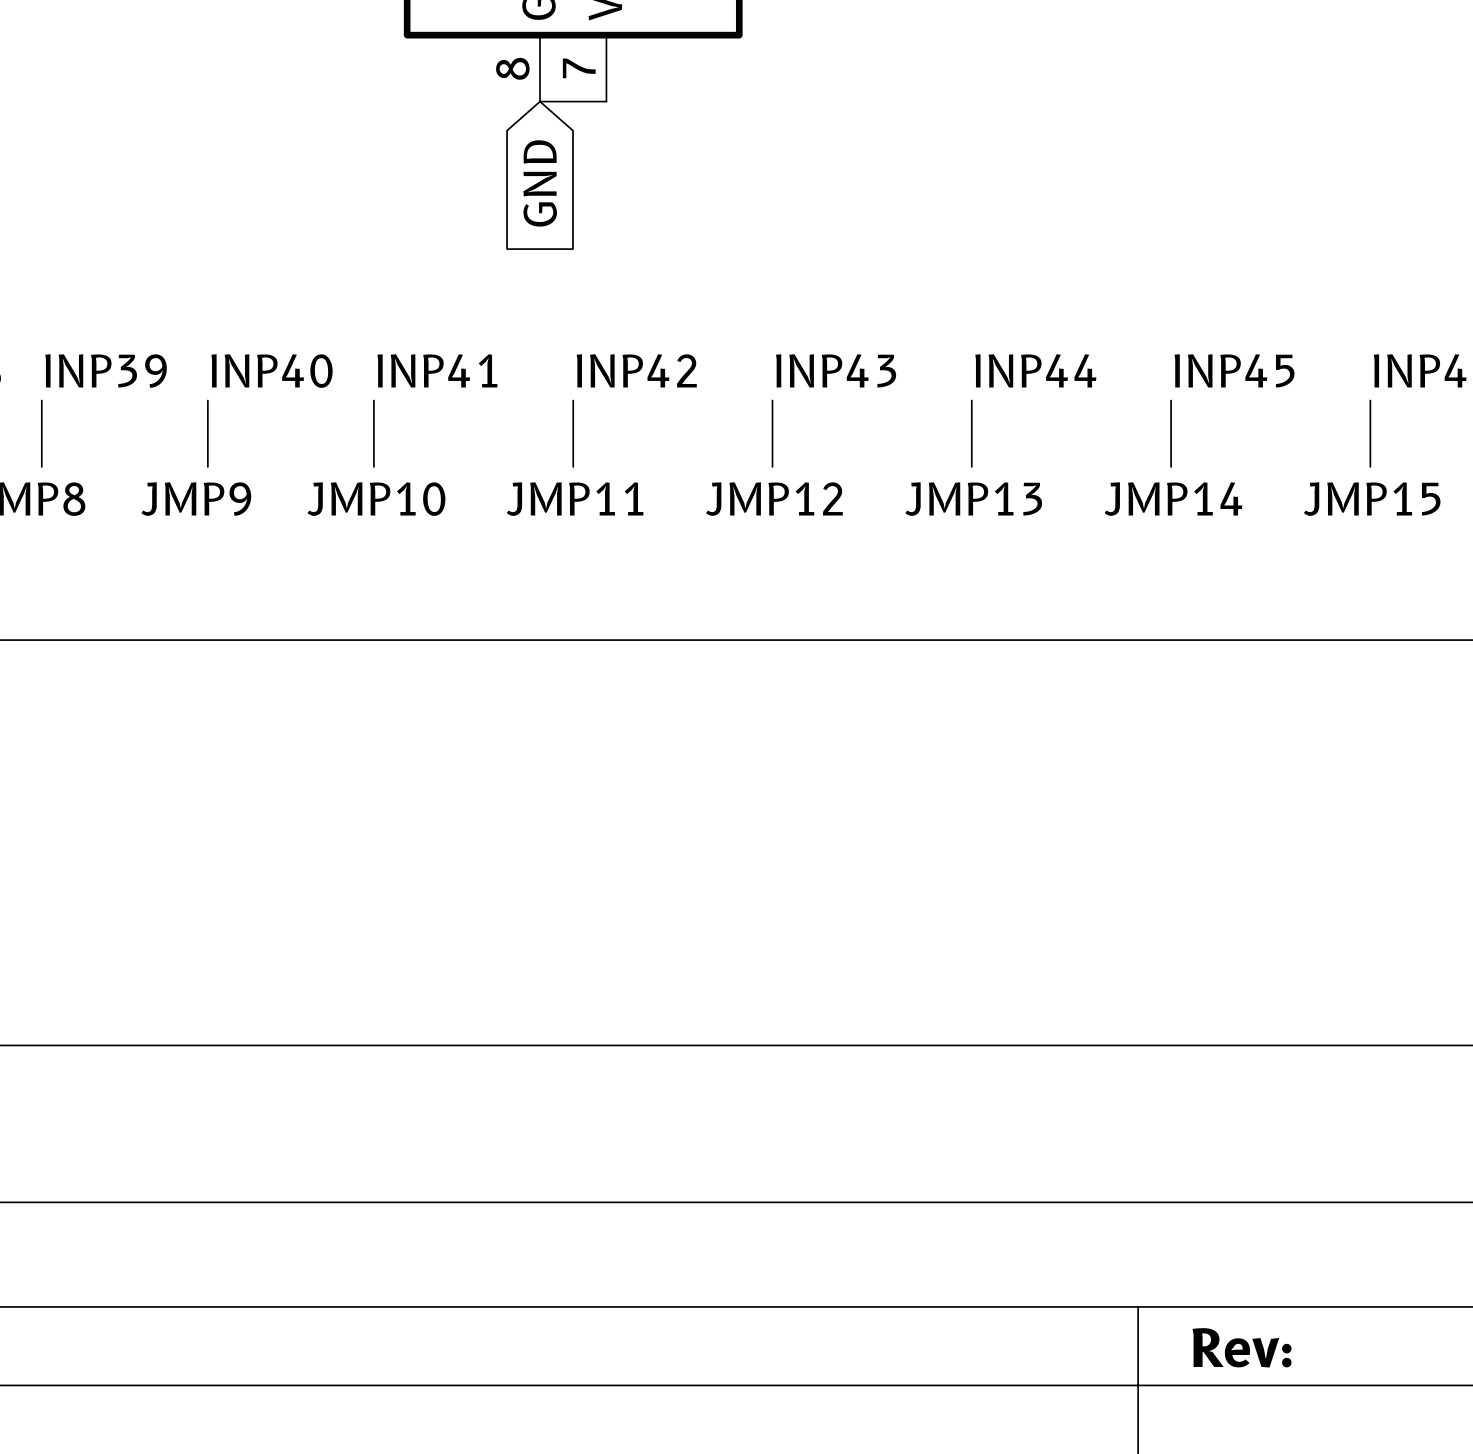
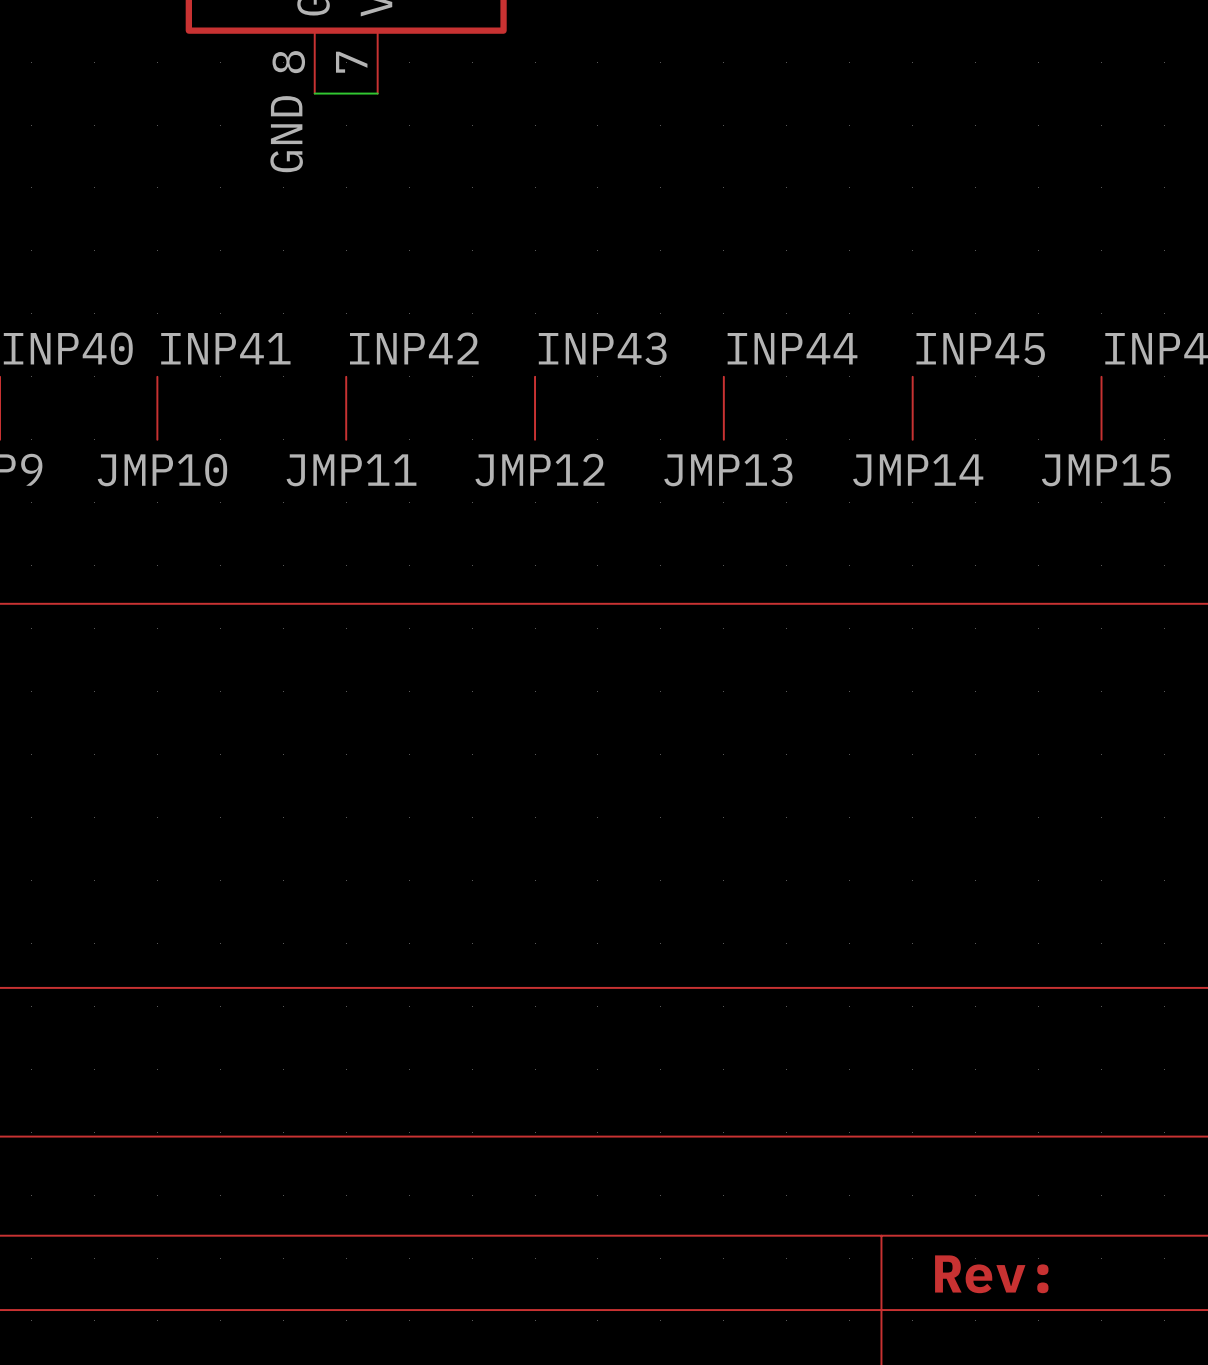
label: none -> GND (286, 134)
global label: GND (540, 183) -> none

